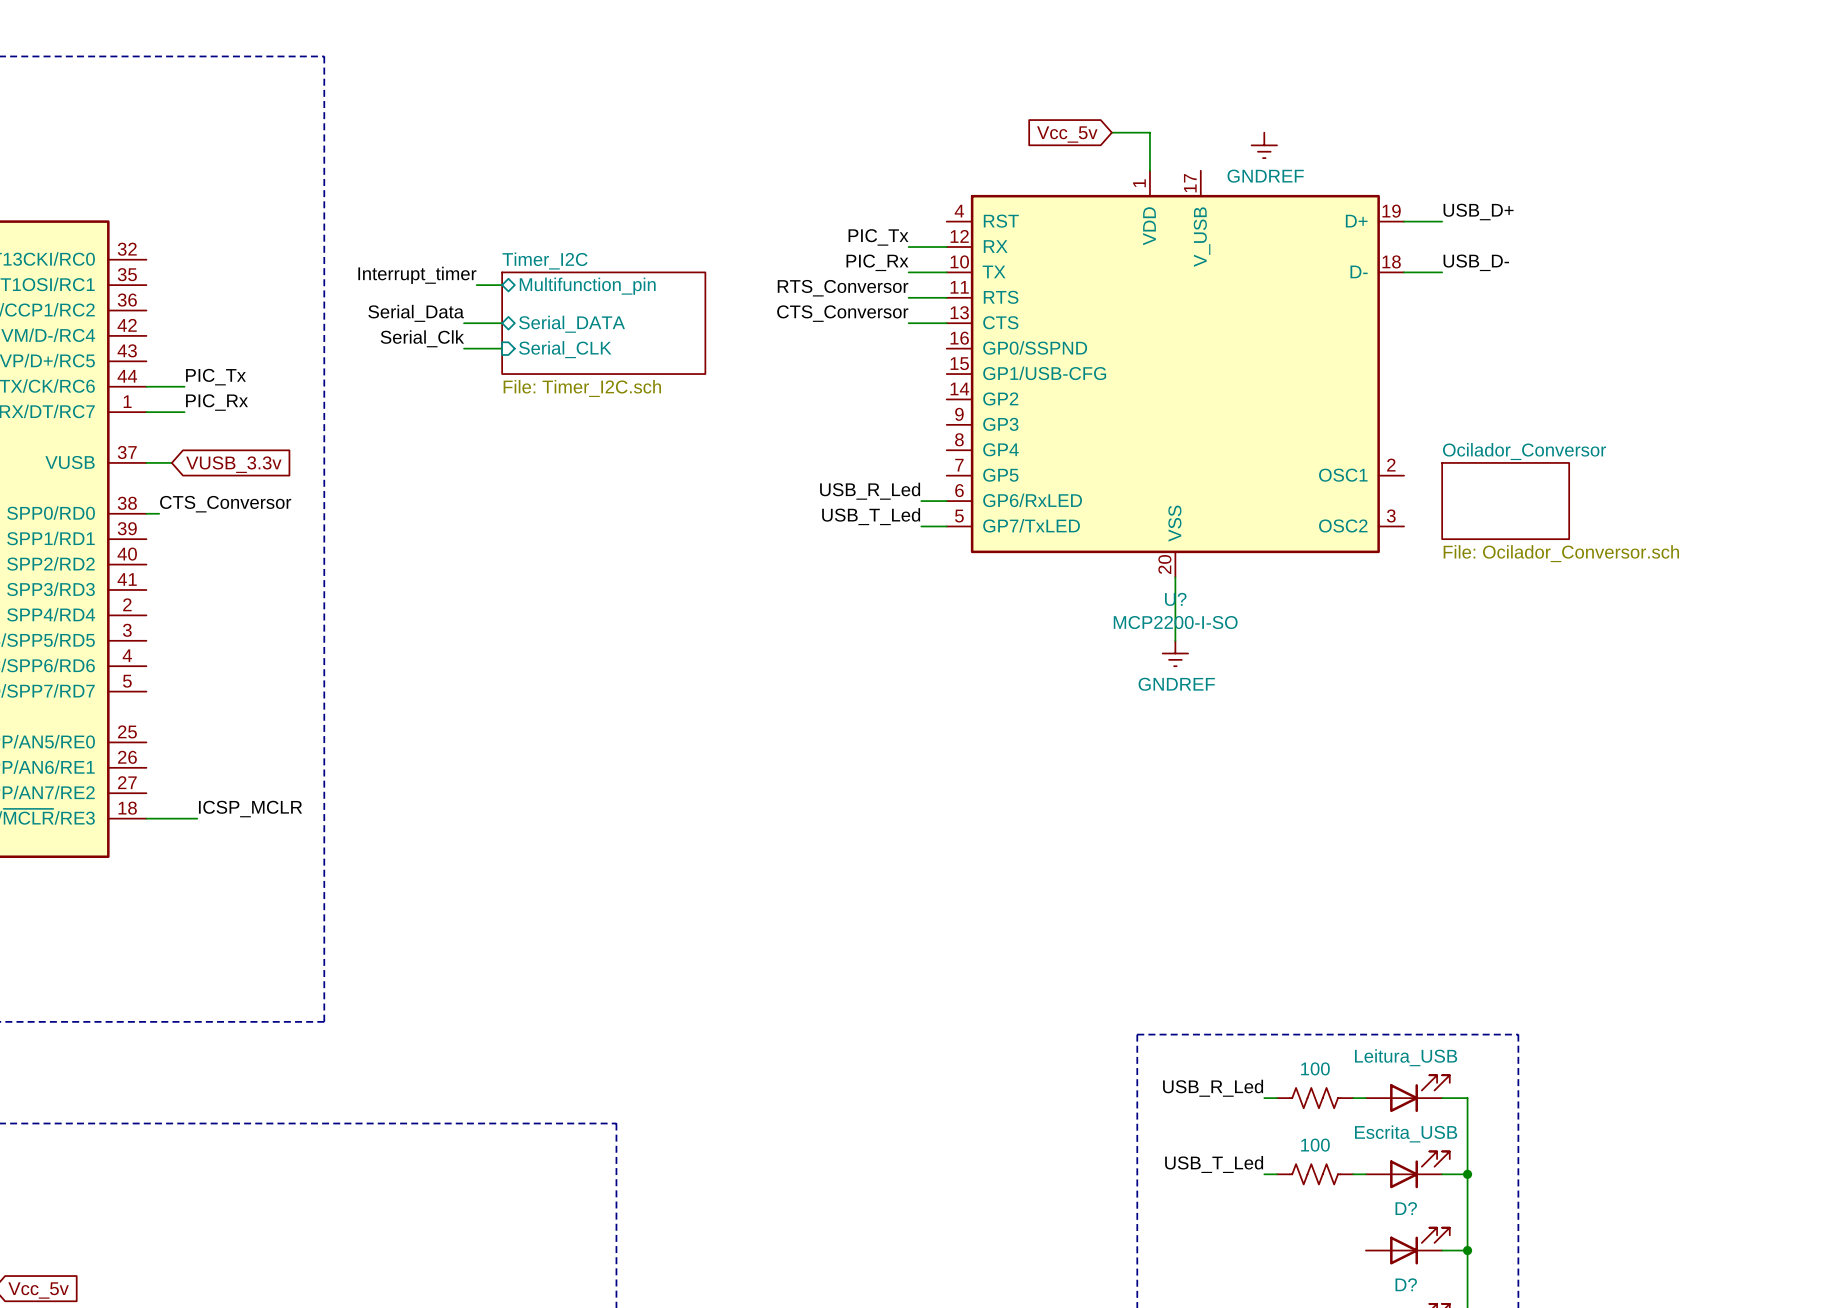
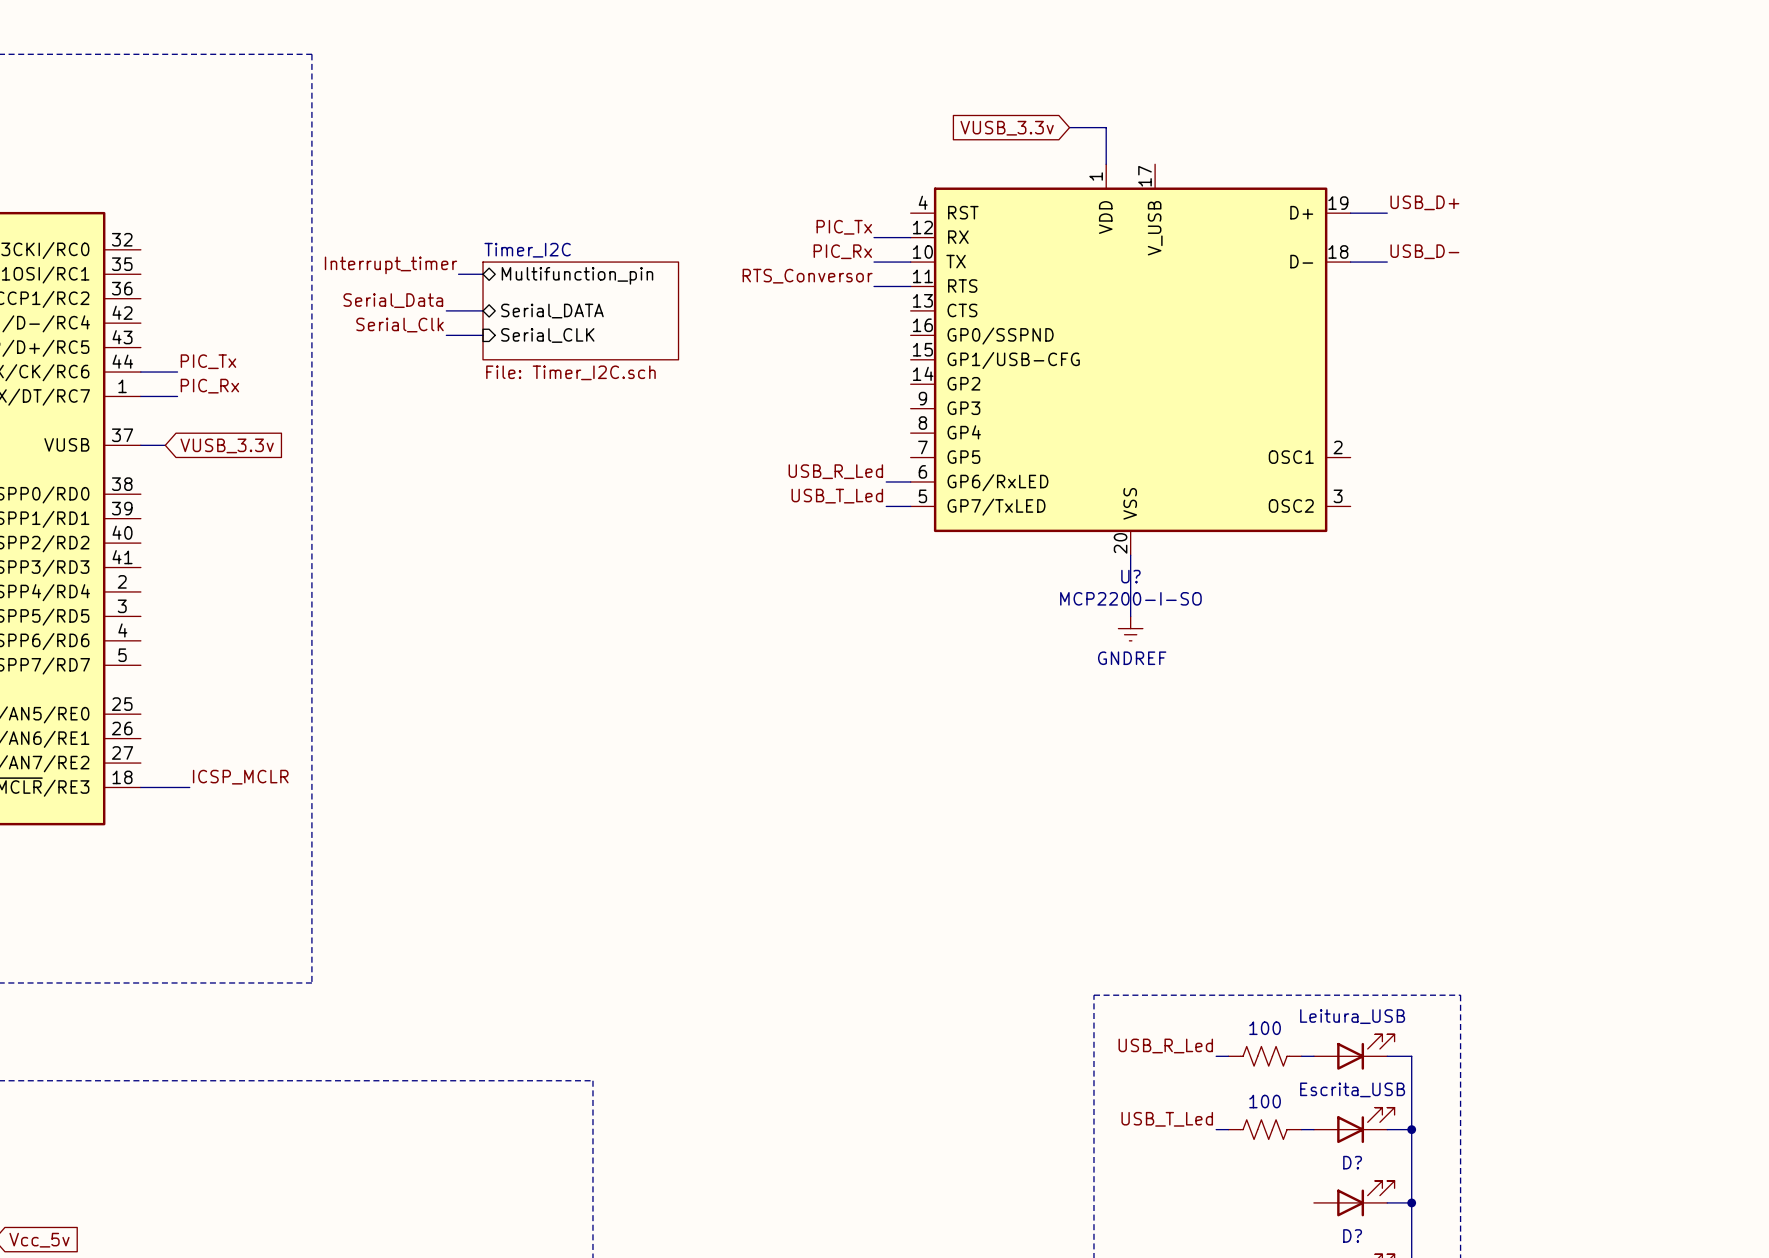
global label: Vcc_5v (1067, 134) -> VUSB_3.3v (1007, 128)
power symbol: GNDREF (1264, 145) -> none
label: CTS_Conversor (842, 313) -> none
wire: (908, 323) (946, 323) -> none
sheet Ocilador_Conversor: File: Ocilador_Conversor.sch (1505, 501) -> none
label: CTS_Conversor (225, 504) -> none
wire: (146, 513) (159, 513) -> none

